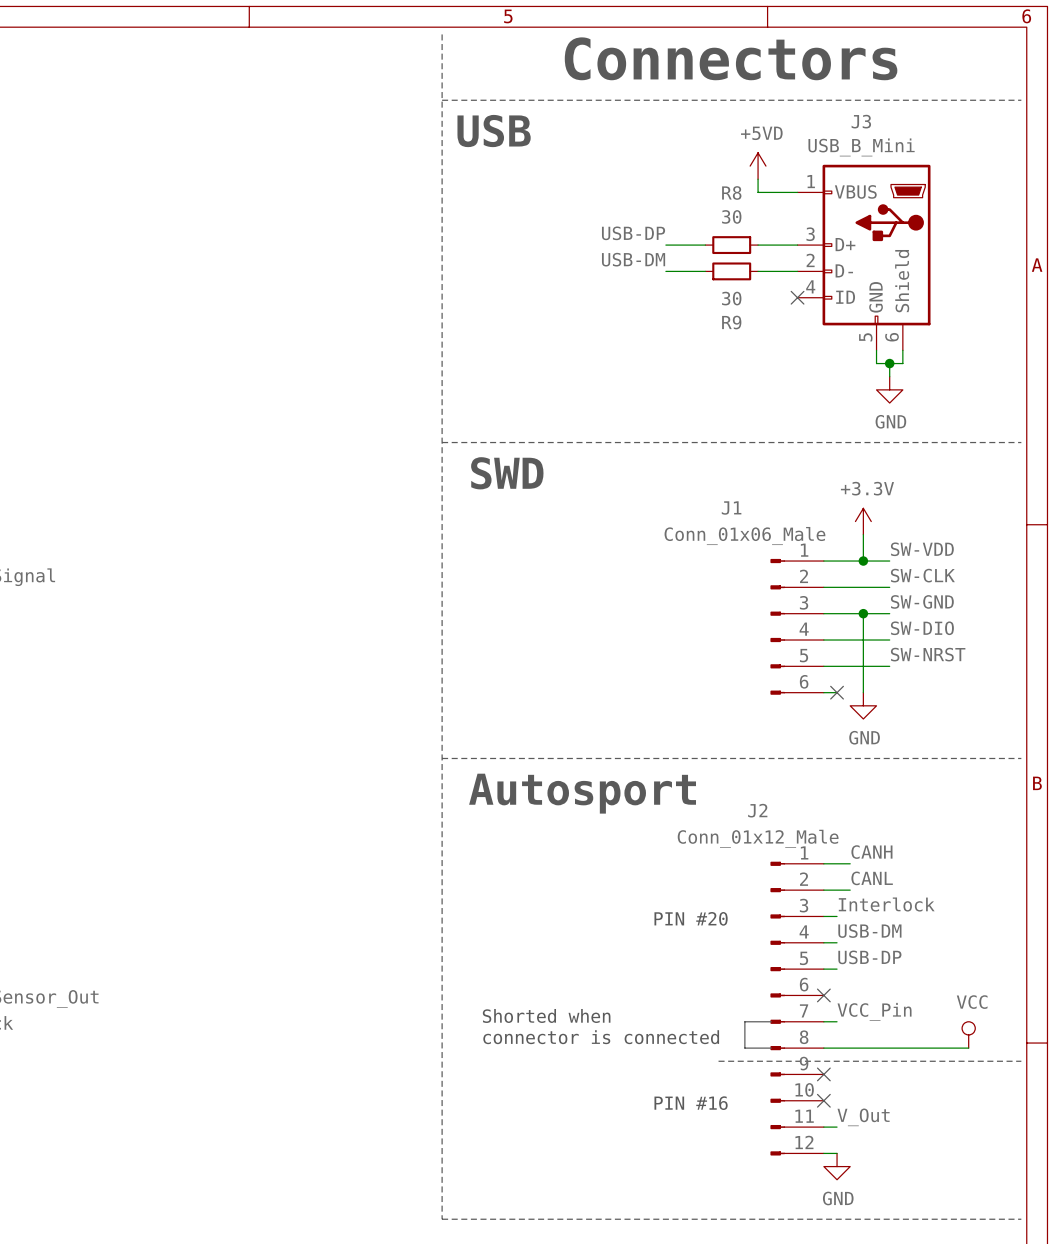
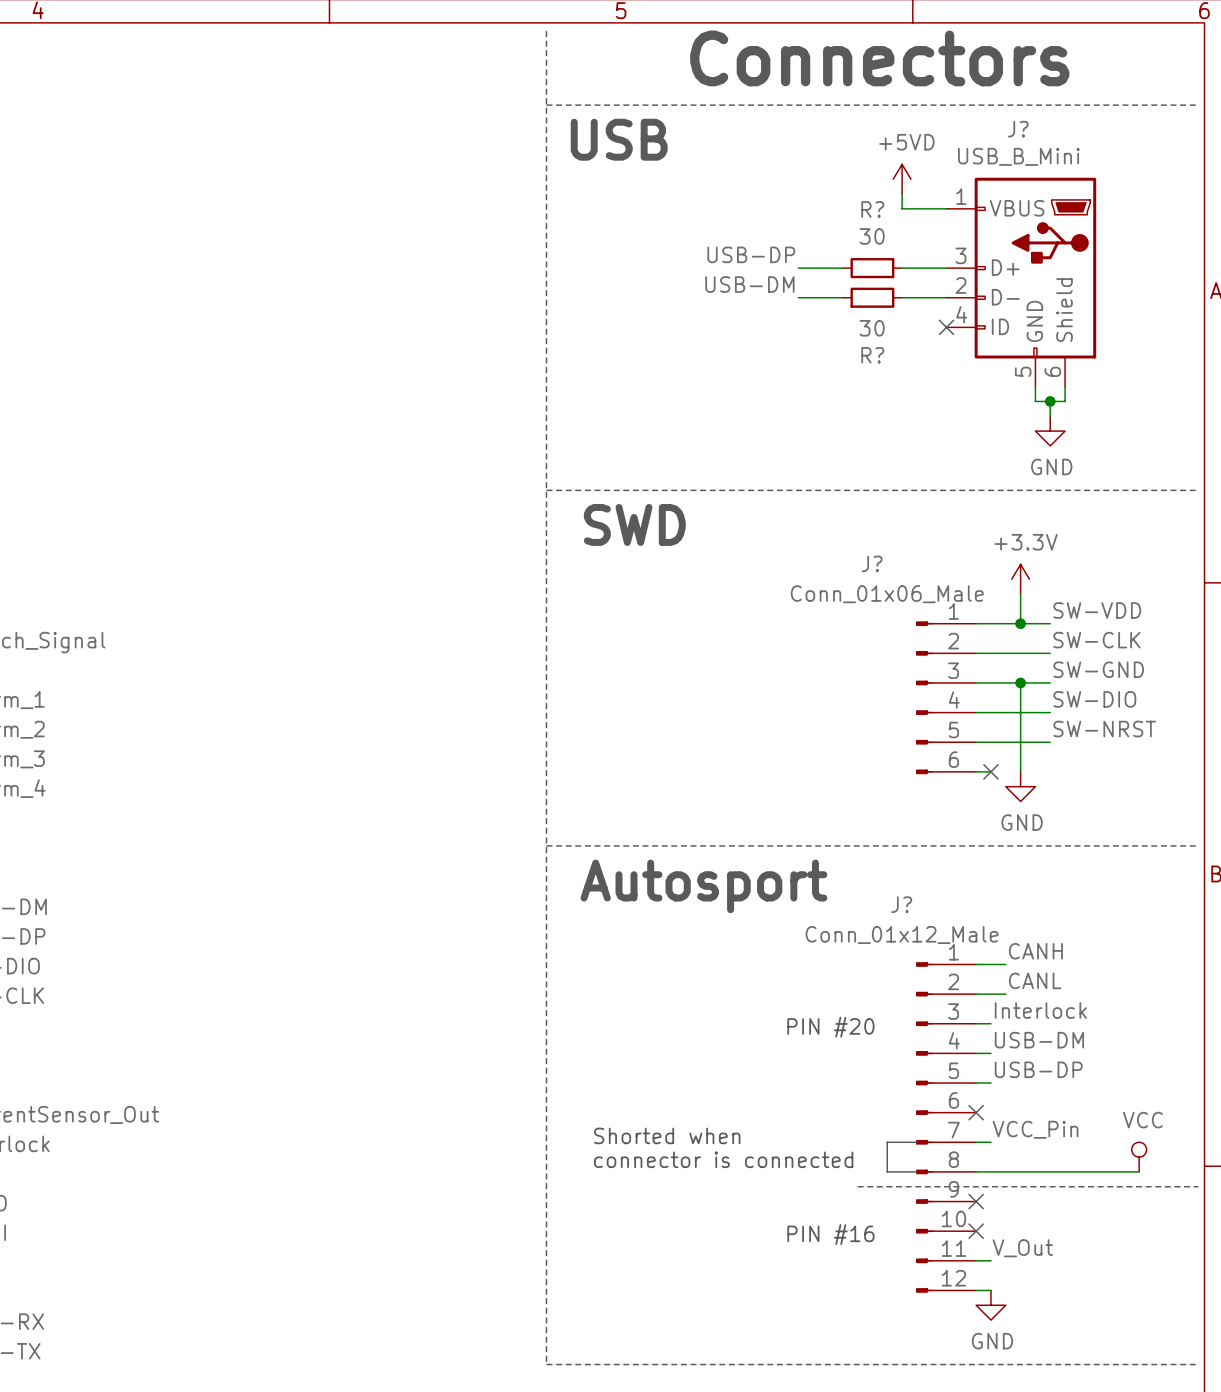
J3 name: J3 (861, 121) -> J? (1018, 129)
R8 name: R8 (731, 192) -> R? (872, 209)
R9 name: R9 (731, 322) -> R? (872, 355)
J1 name: J1 (731, 508) -> J? (872, 563)
J2 name: J2 (757, 810) -> J? (901, 904)

